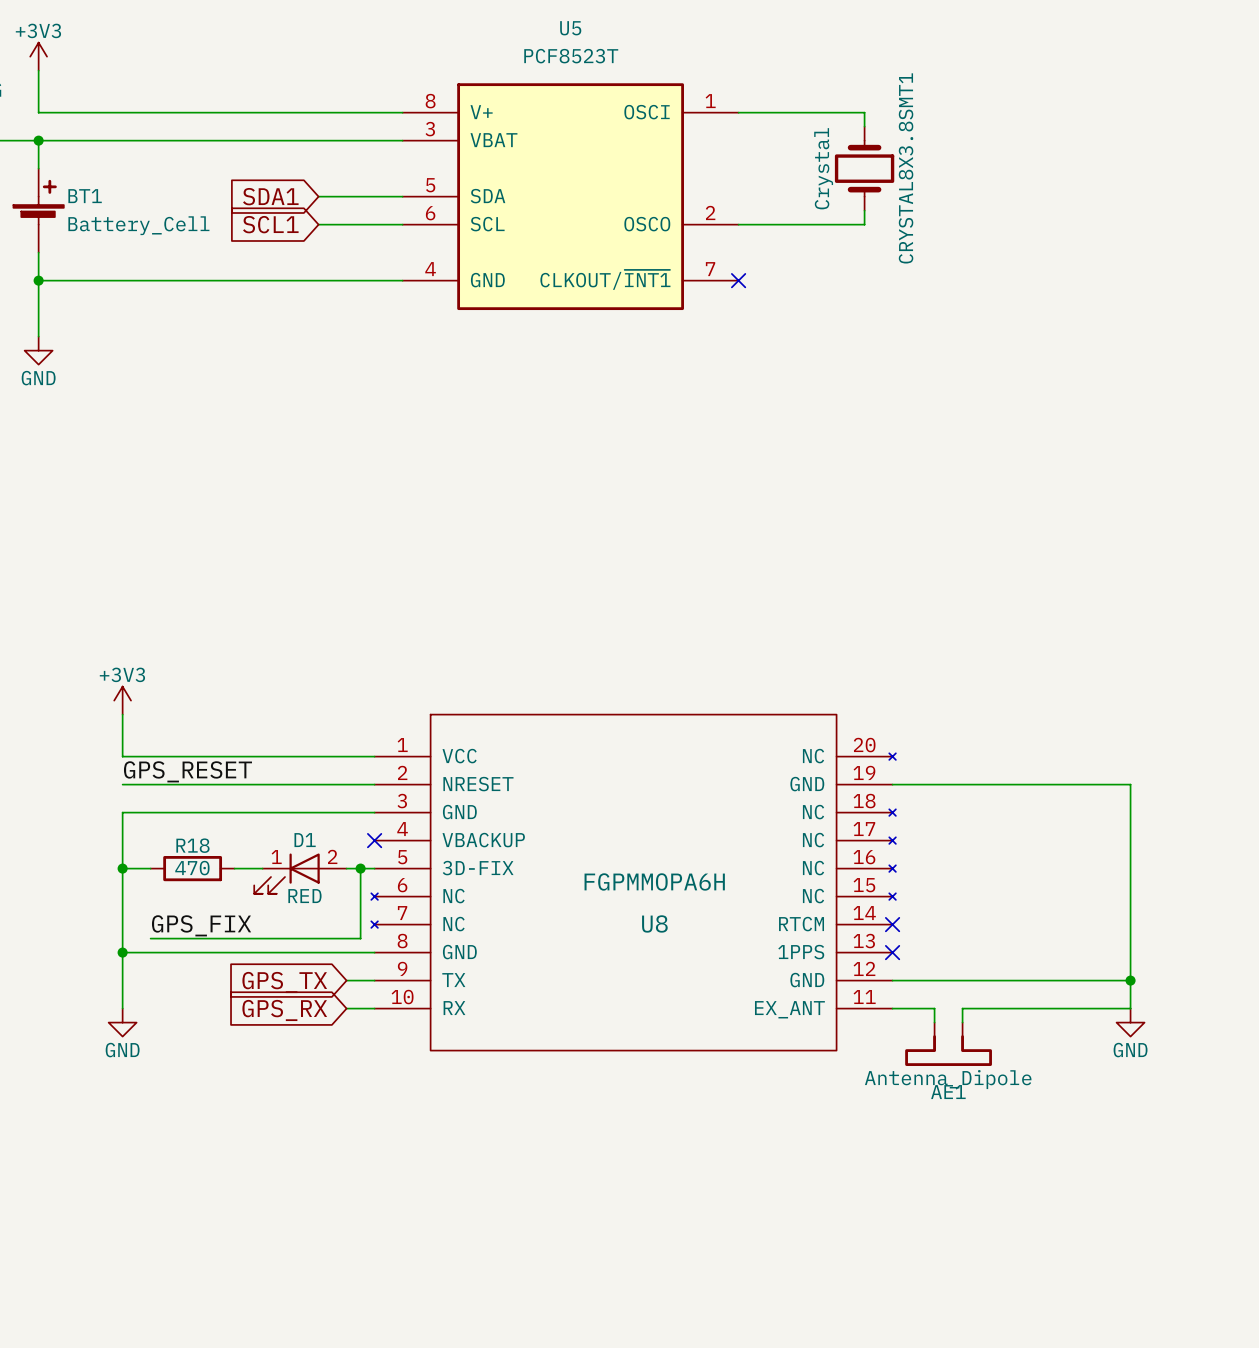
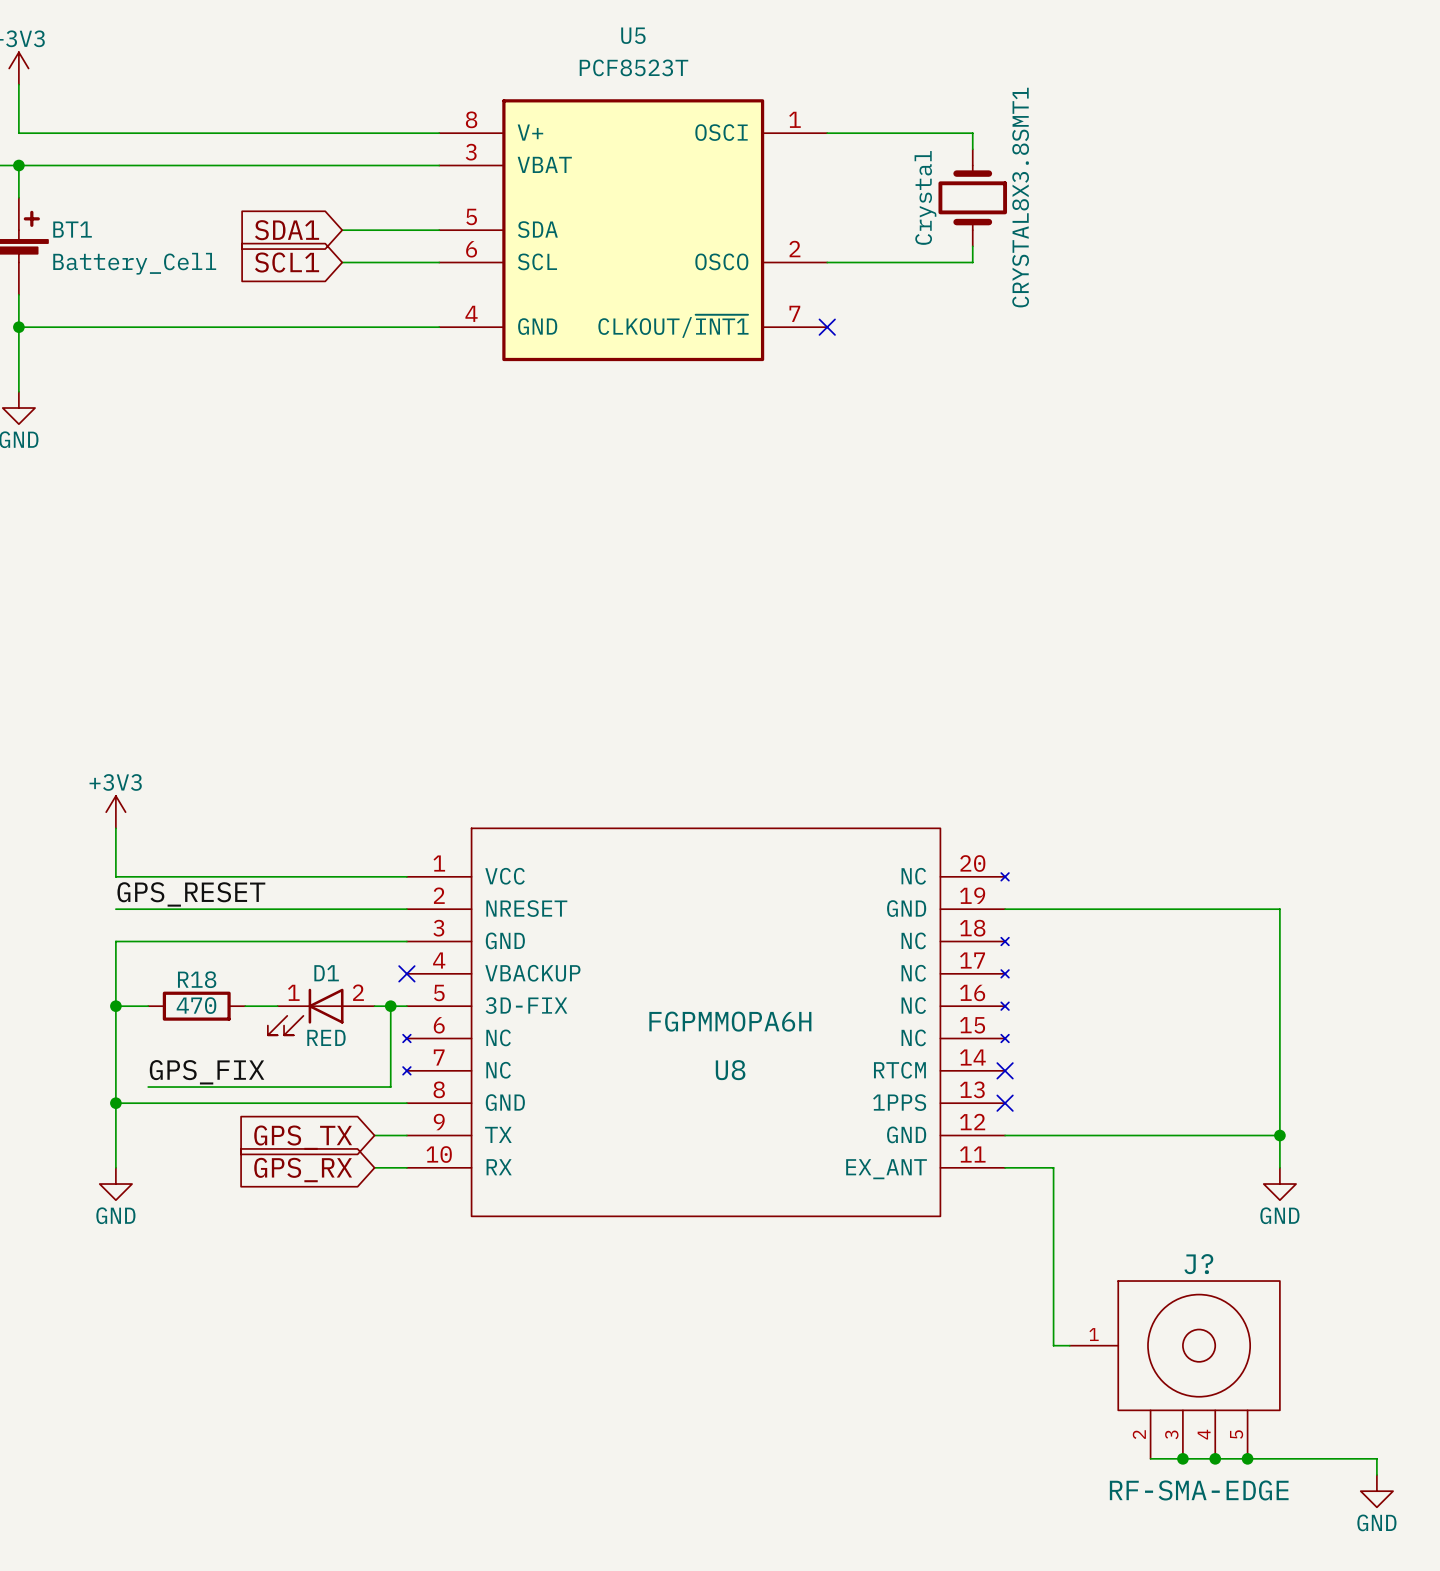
wire: (1130, 1008) (962, 1008) (962, 1022) -> none
wire: none -> (1053, 1184) (1053, 1345) (1069, 1345)
AE1: Antenna_Dipole (948, 1044) -> none
J?: none -> RF-SMA-EDGE (1174, 1369)
wire: none -> (1150, 1458) (1376, 1458) (1376, 1475)
junction: none -> (1182, 1458)
junction: none -> (1215, 1458)
junction: none -> (1247, 1458)
power symbol: none -> GND (1376, 1491)

